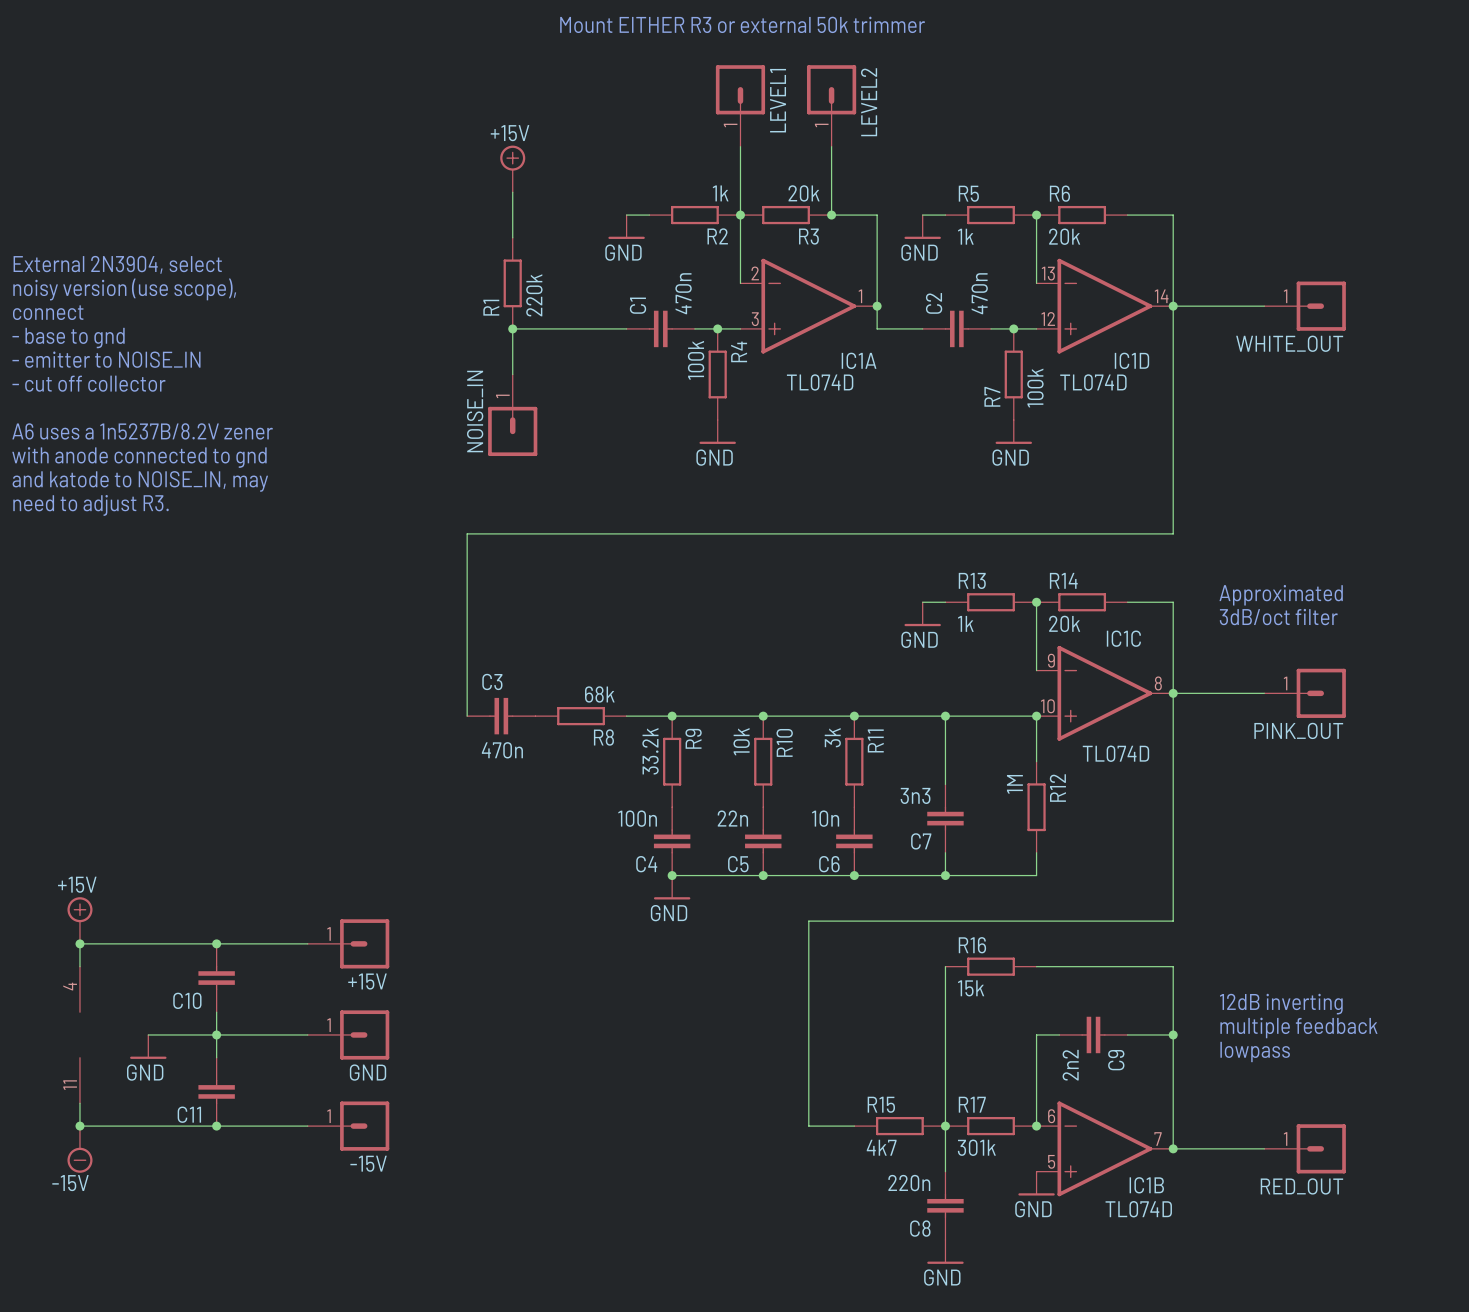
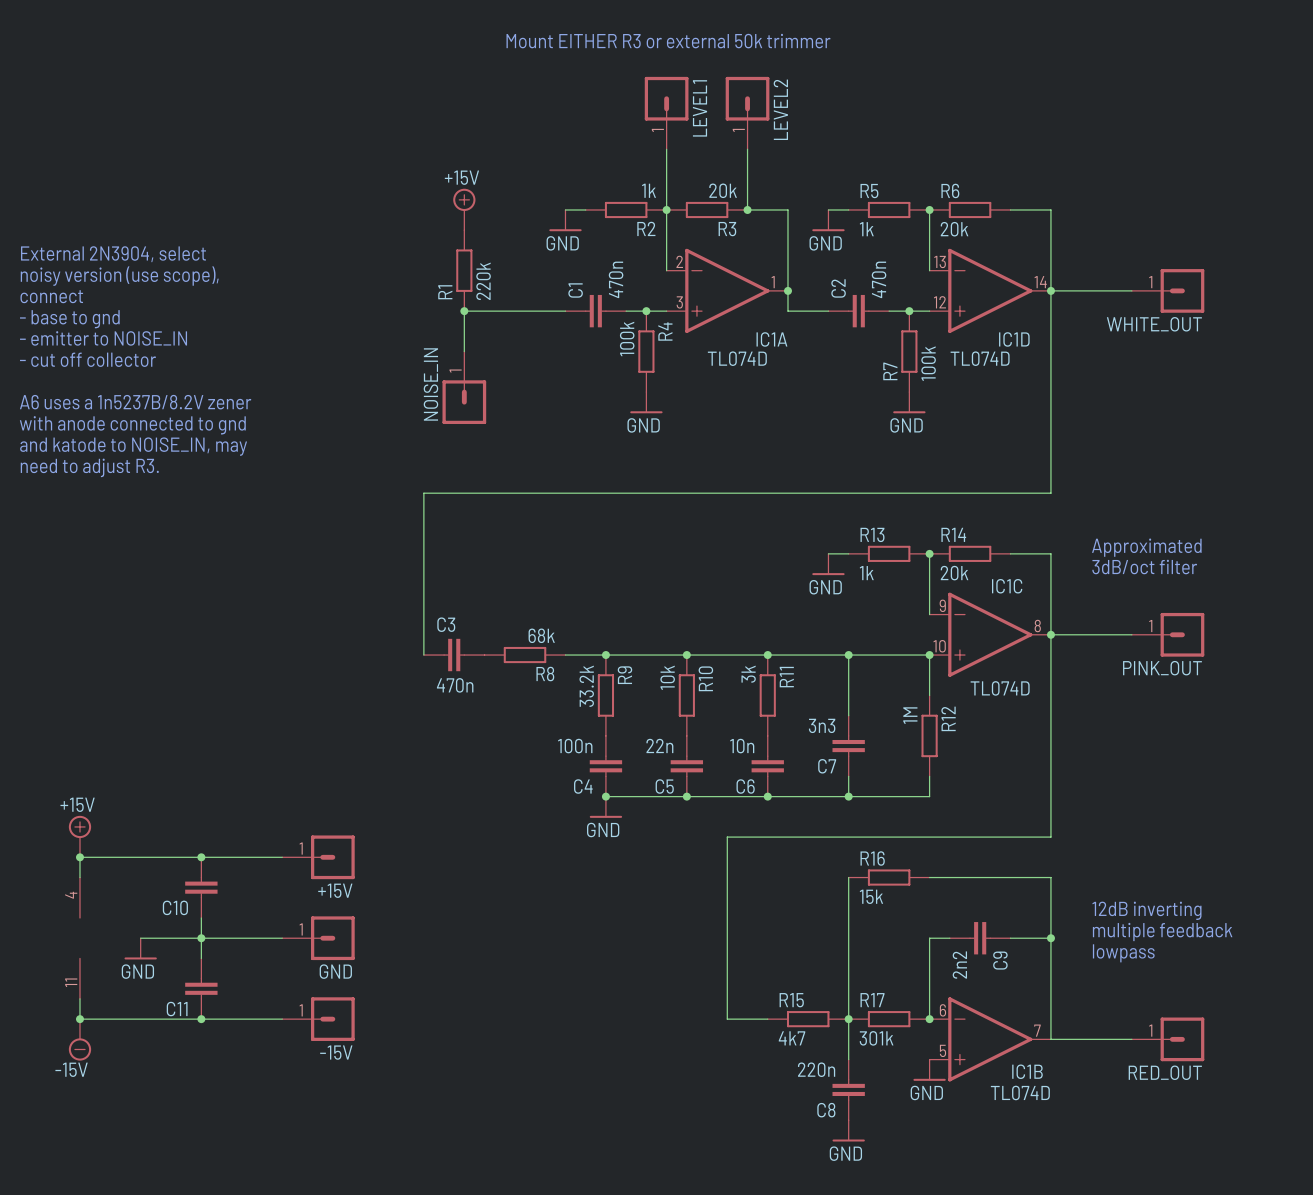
power symbol position: +15V (512, 168) -> +15V (464, 209)
junction: (1173, 1148) -> none

